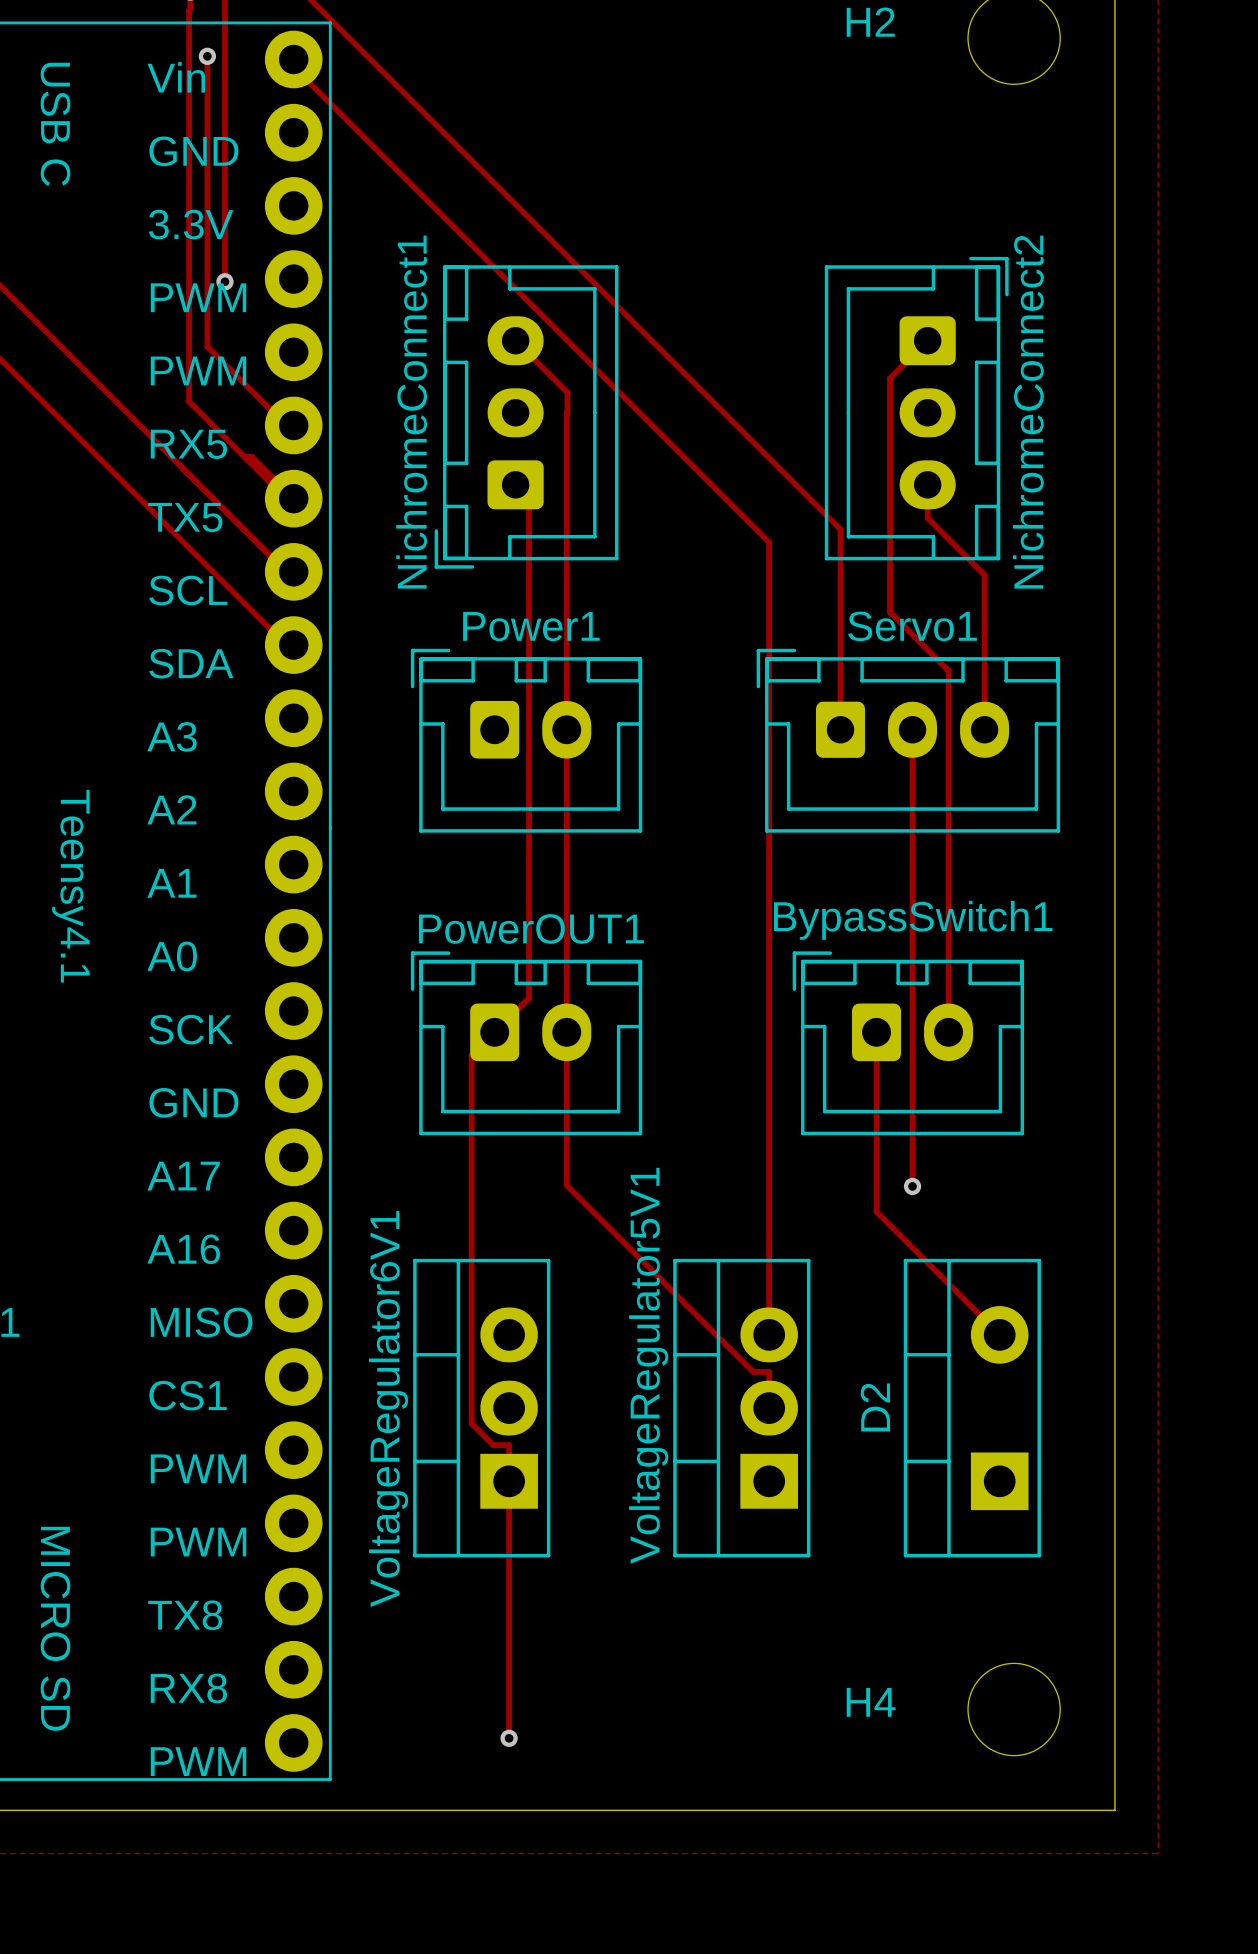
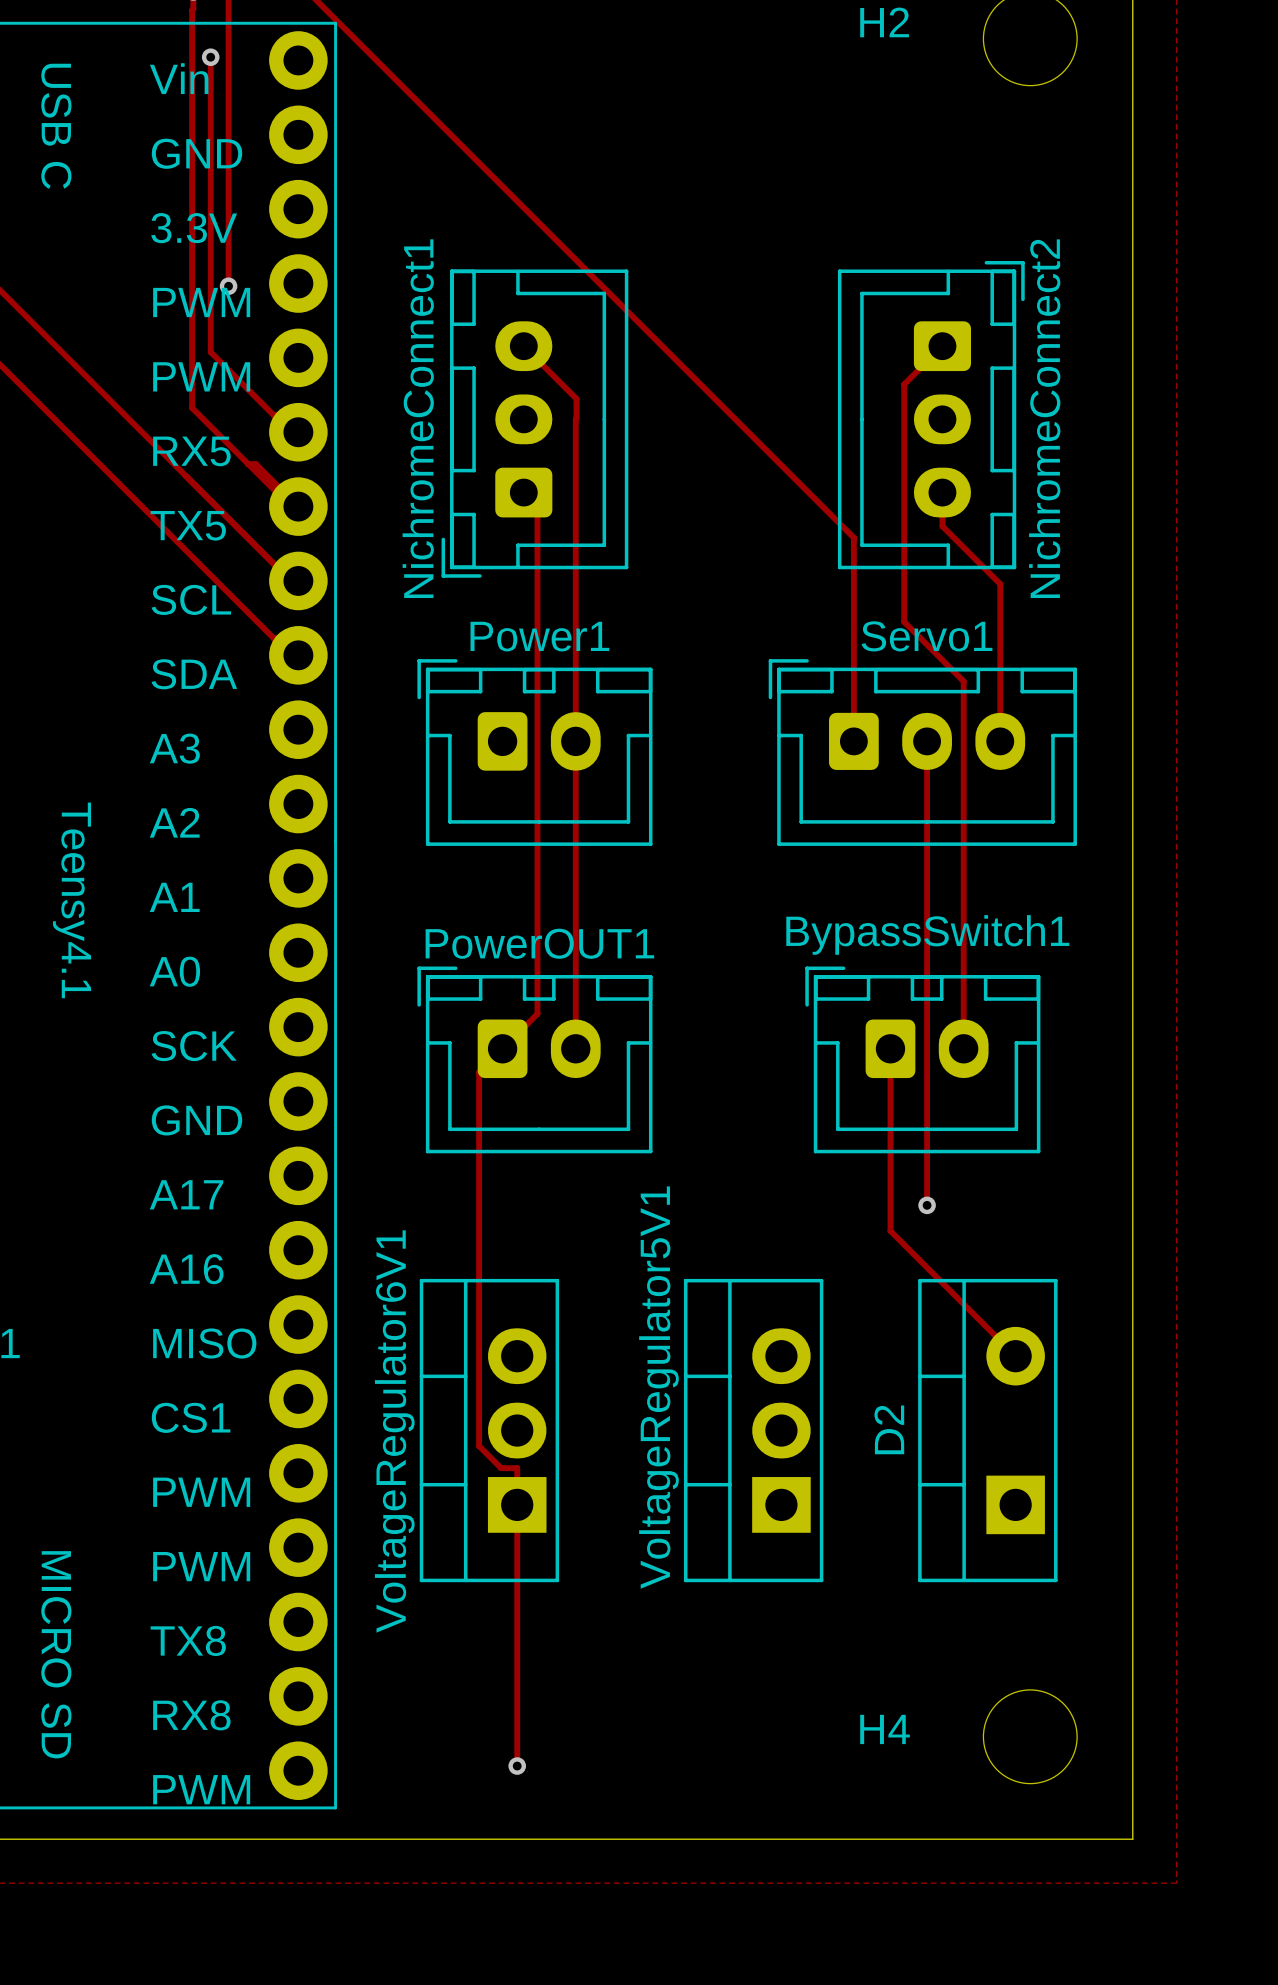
track: (293, 66) (769, 542) (769, 1334) -> none
track: (566, 1032) (566, 1185) (753, 1371) (769, 1371) (769, 1408) -> none

